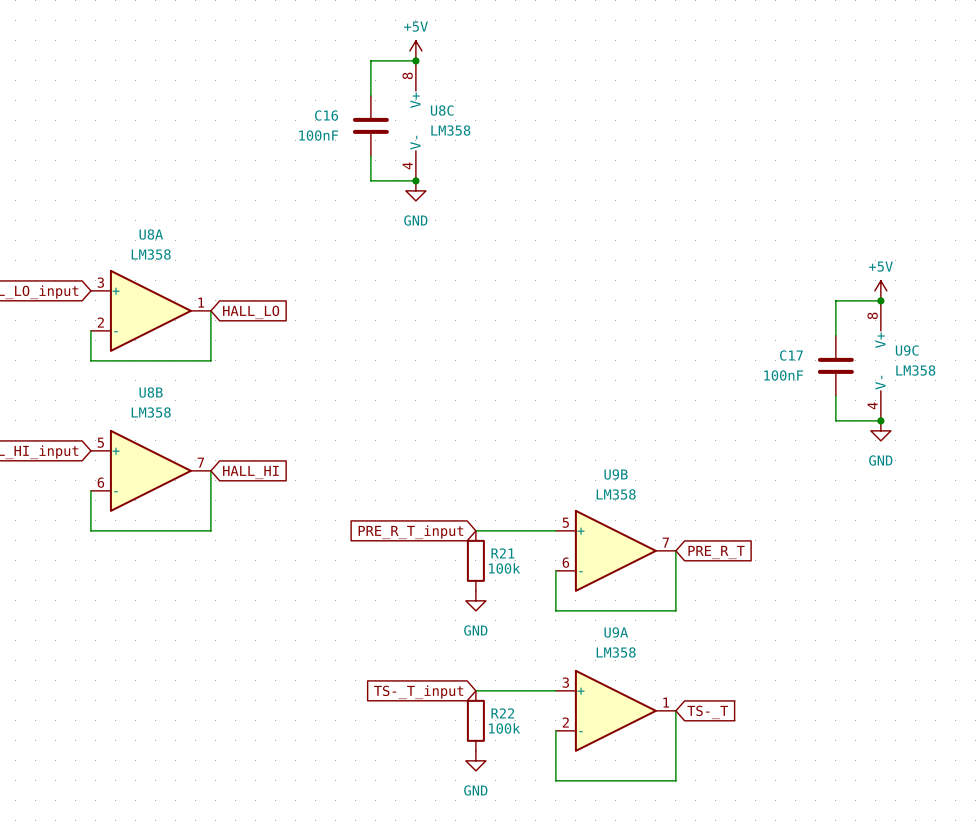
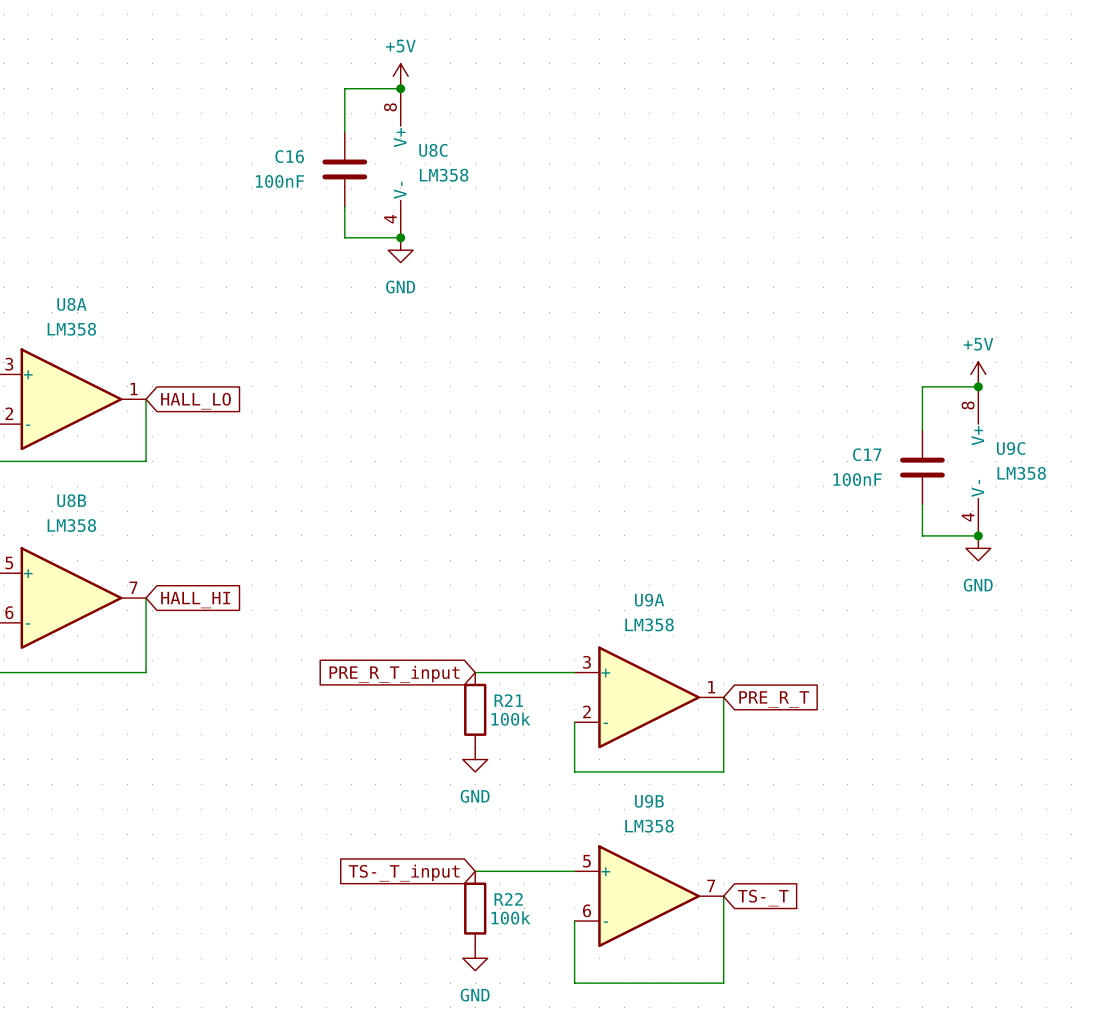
U9B position: (615, 550) -> (649, 896)
U9A position: (615, 710) -> (649, 697)

